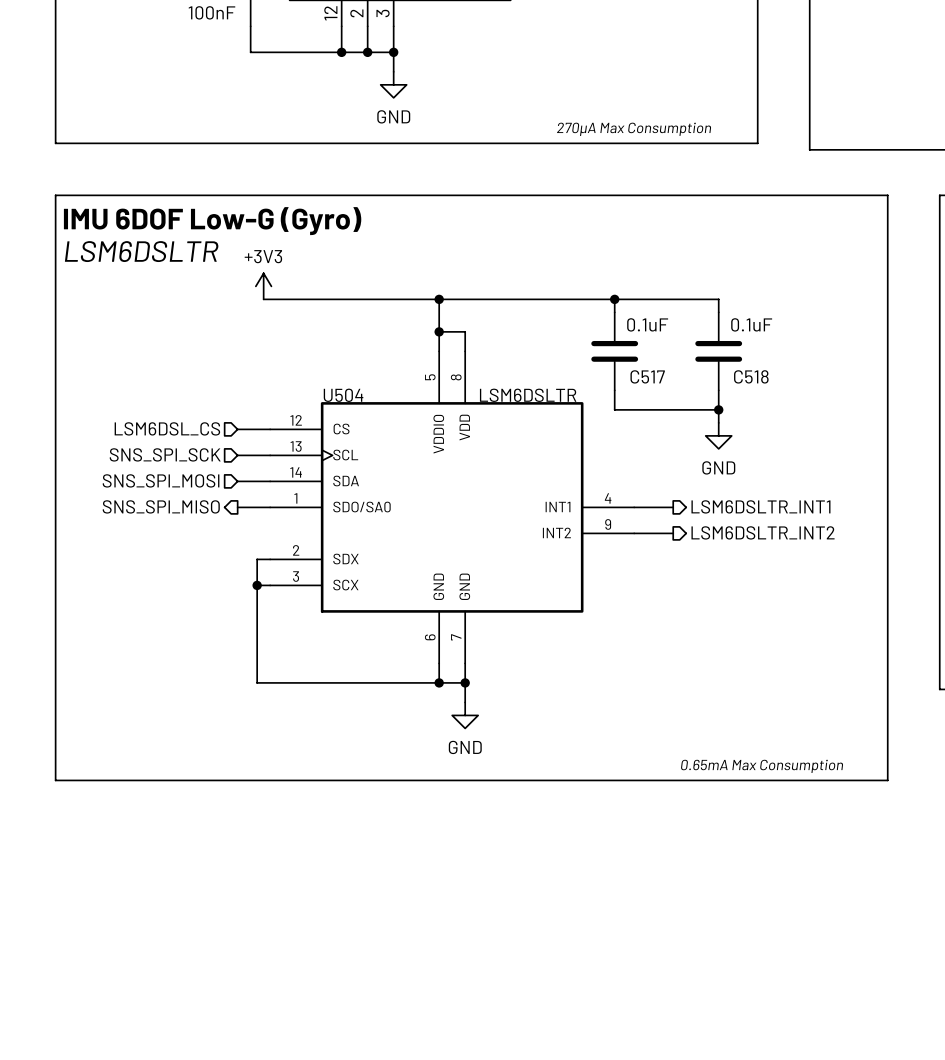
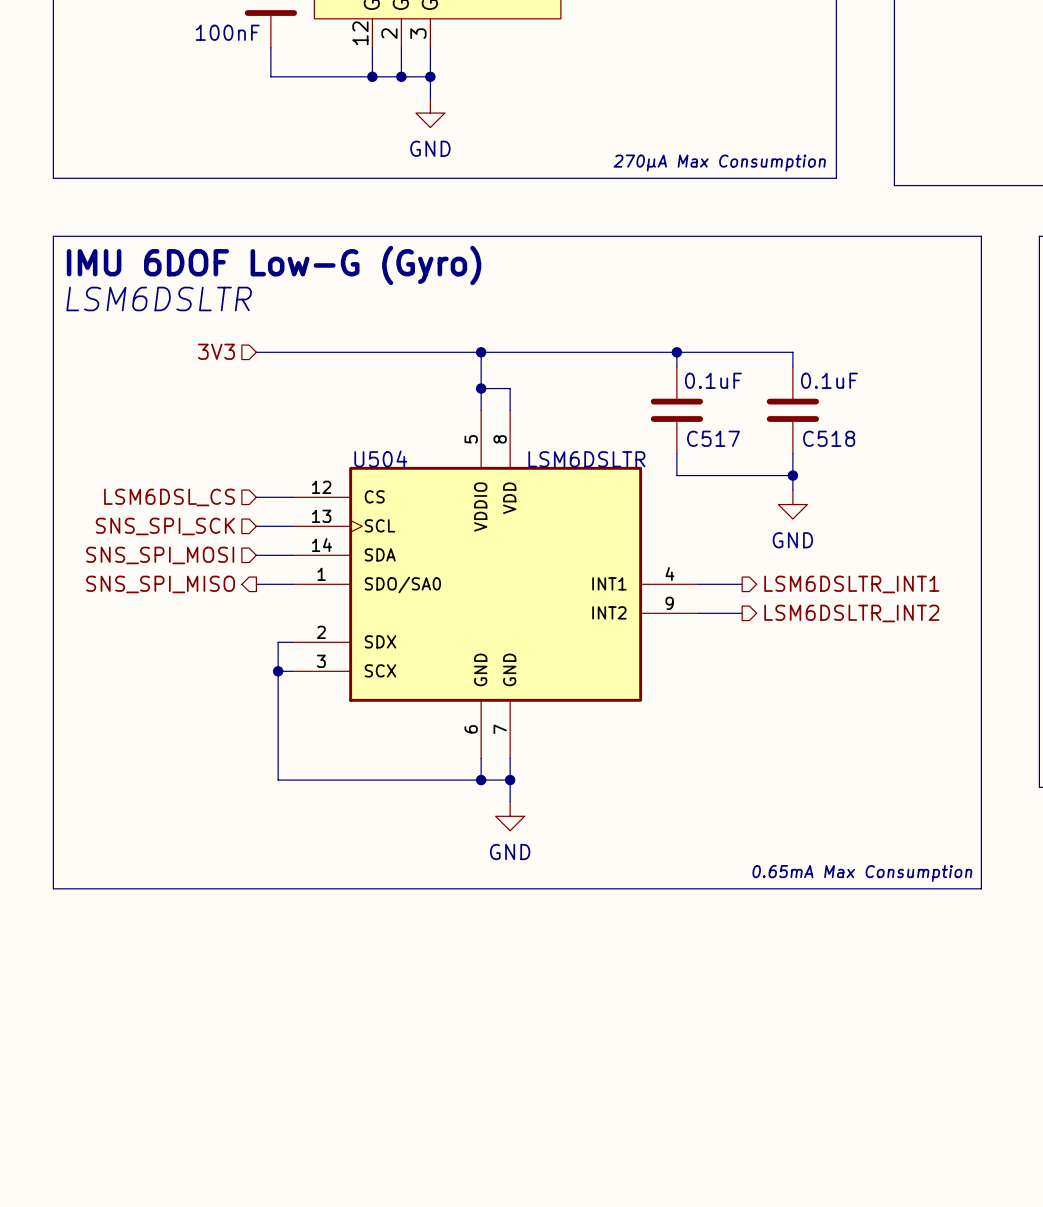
power symbol: +3V3 (263, 286) -> none
hierarchical label: none -> 3V3 (216, 351)
wire: none -> (256, 352) (285, 352)

